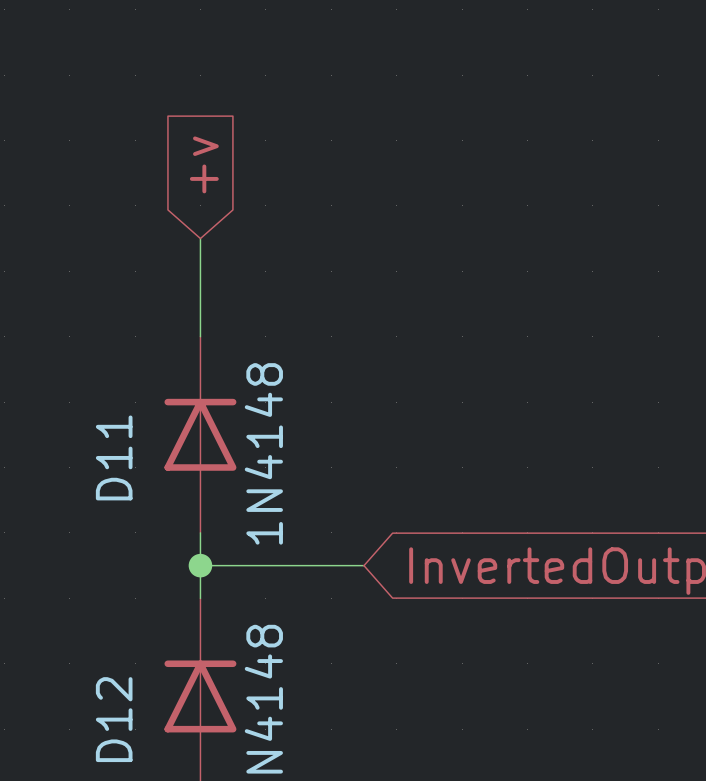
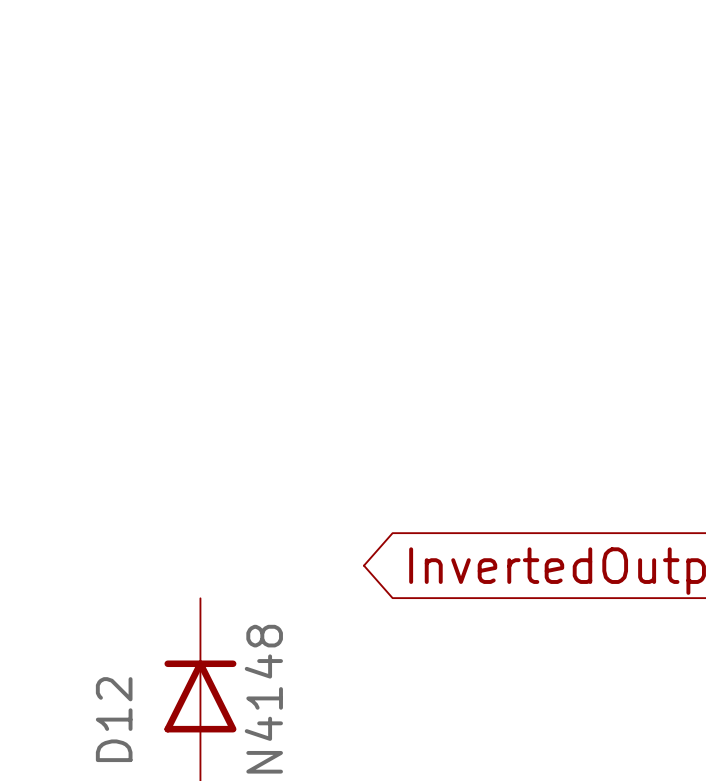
global label: +v (204, 164) -> none
wire: (200, 238) (200, 336) -> none
D11: 1N4148 (200, 434) -> none
wire: (200, 532) (200, 598) -> none
wire: (200, 565) (363, 565) -> none
junction: (200, 565) -> none

